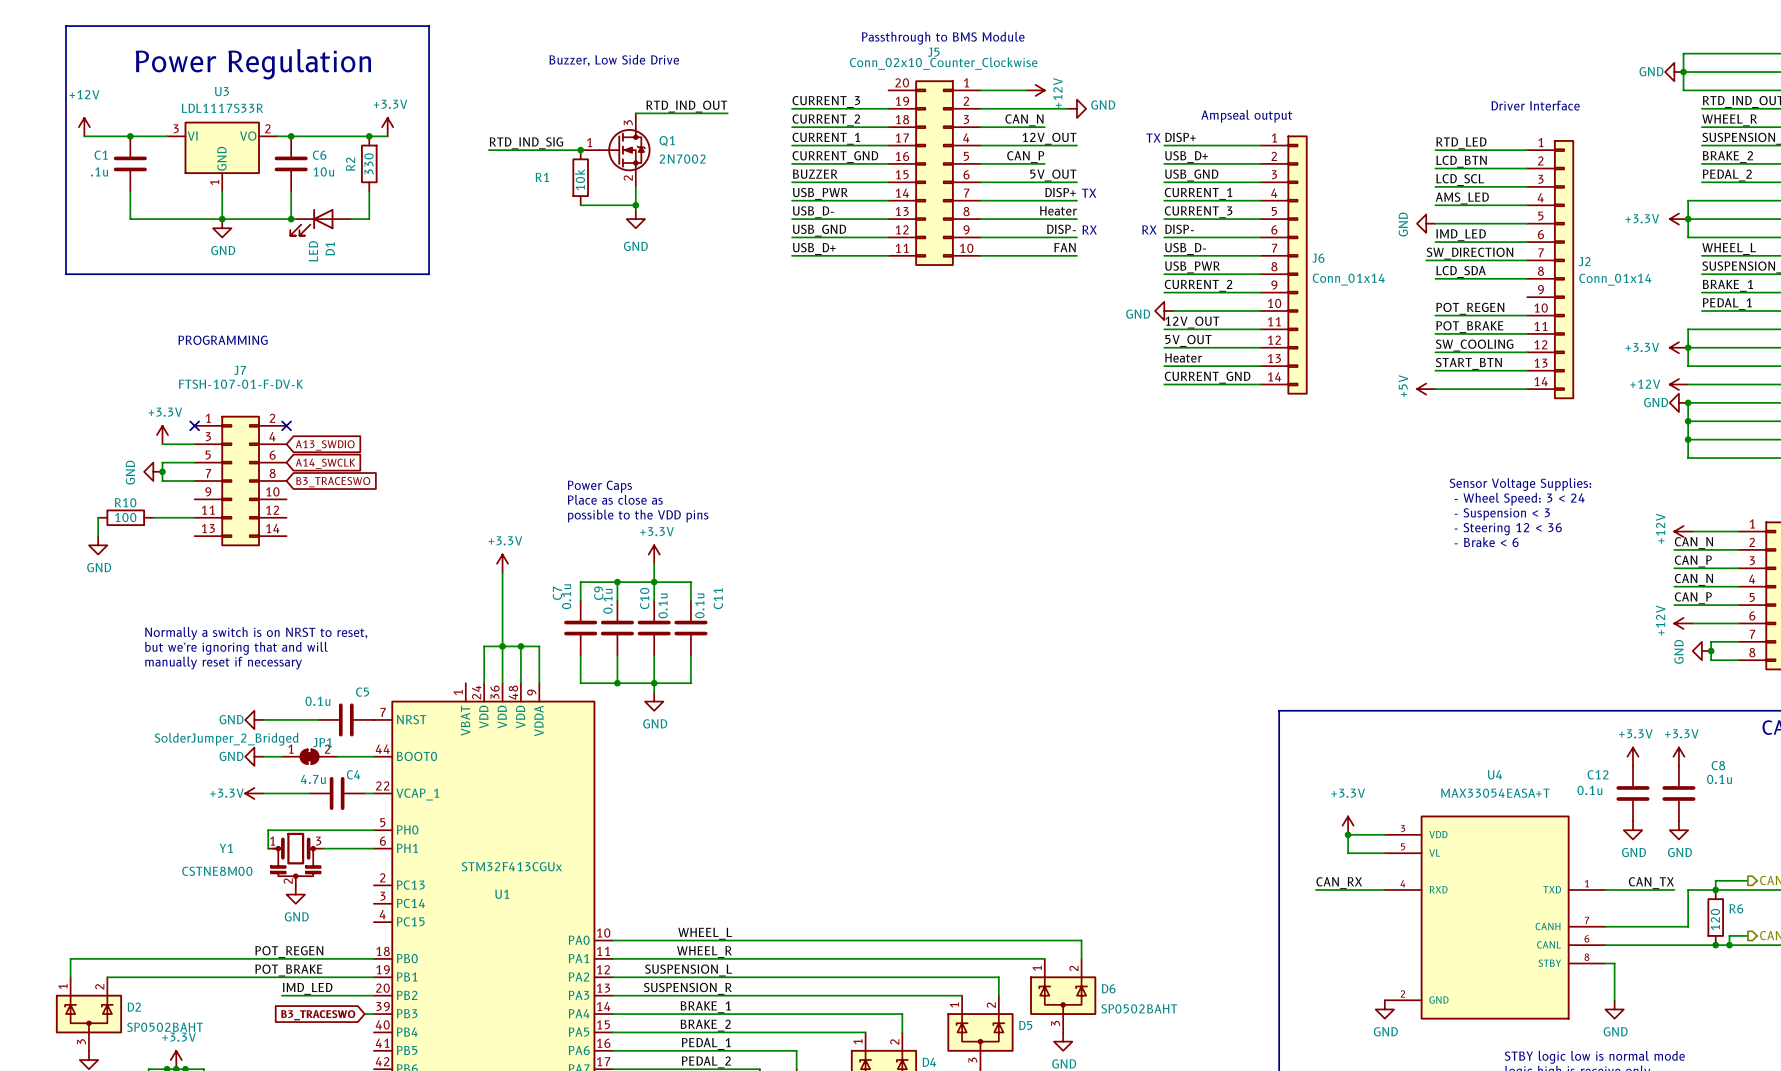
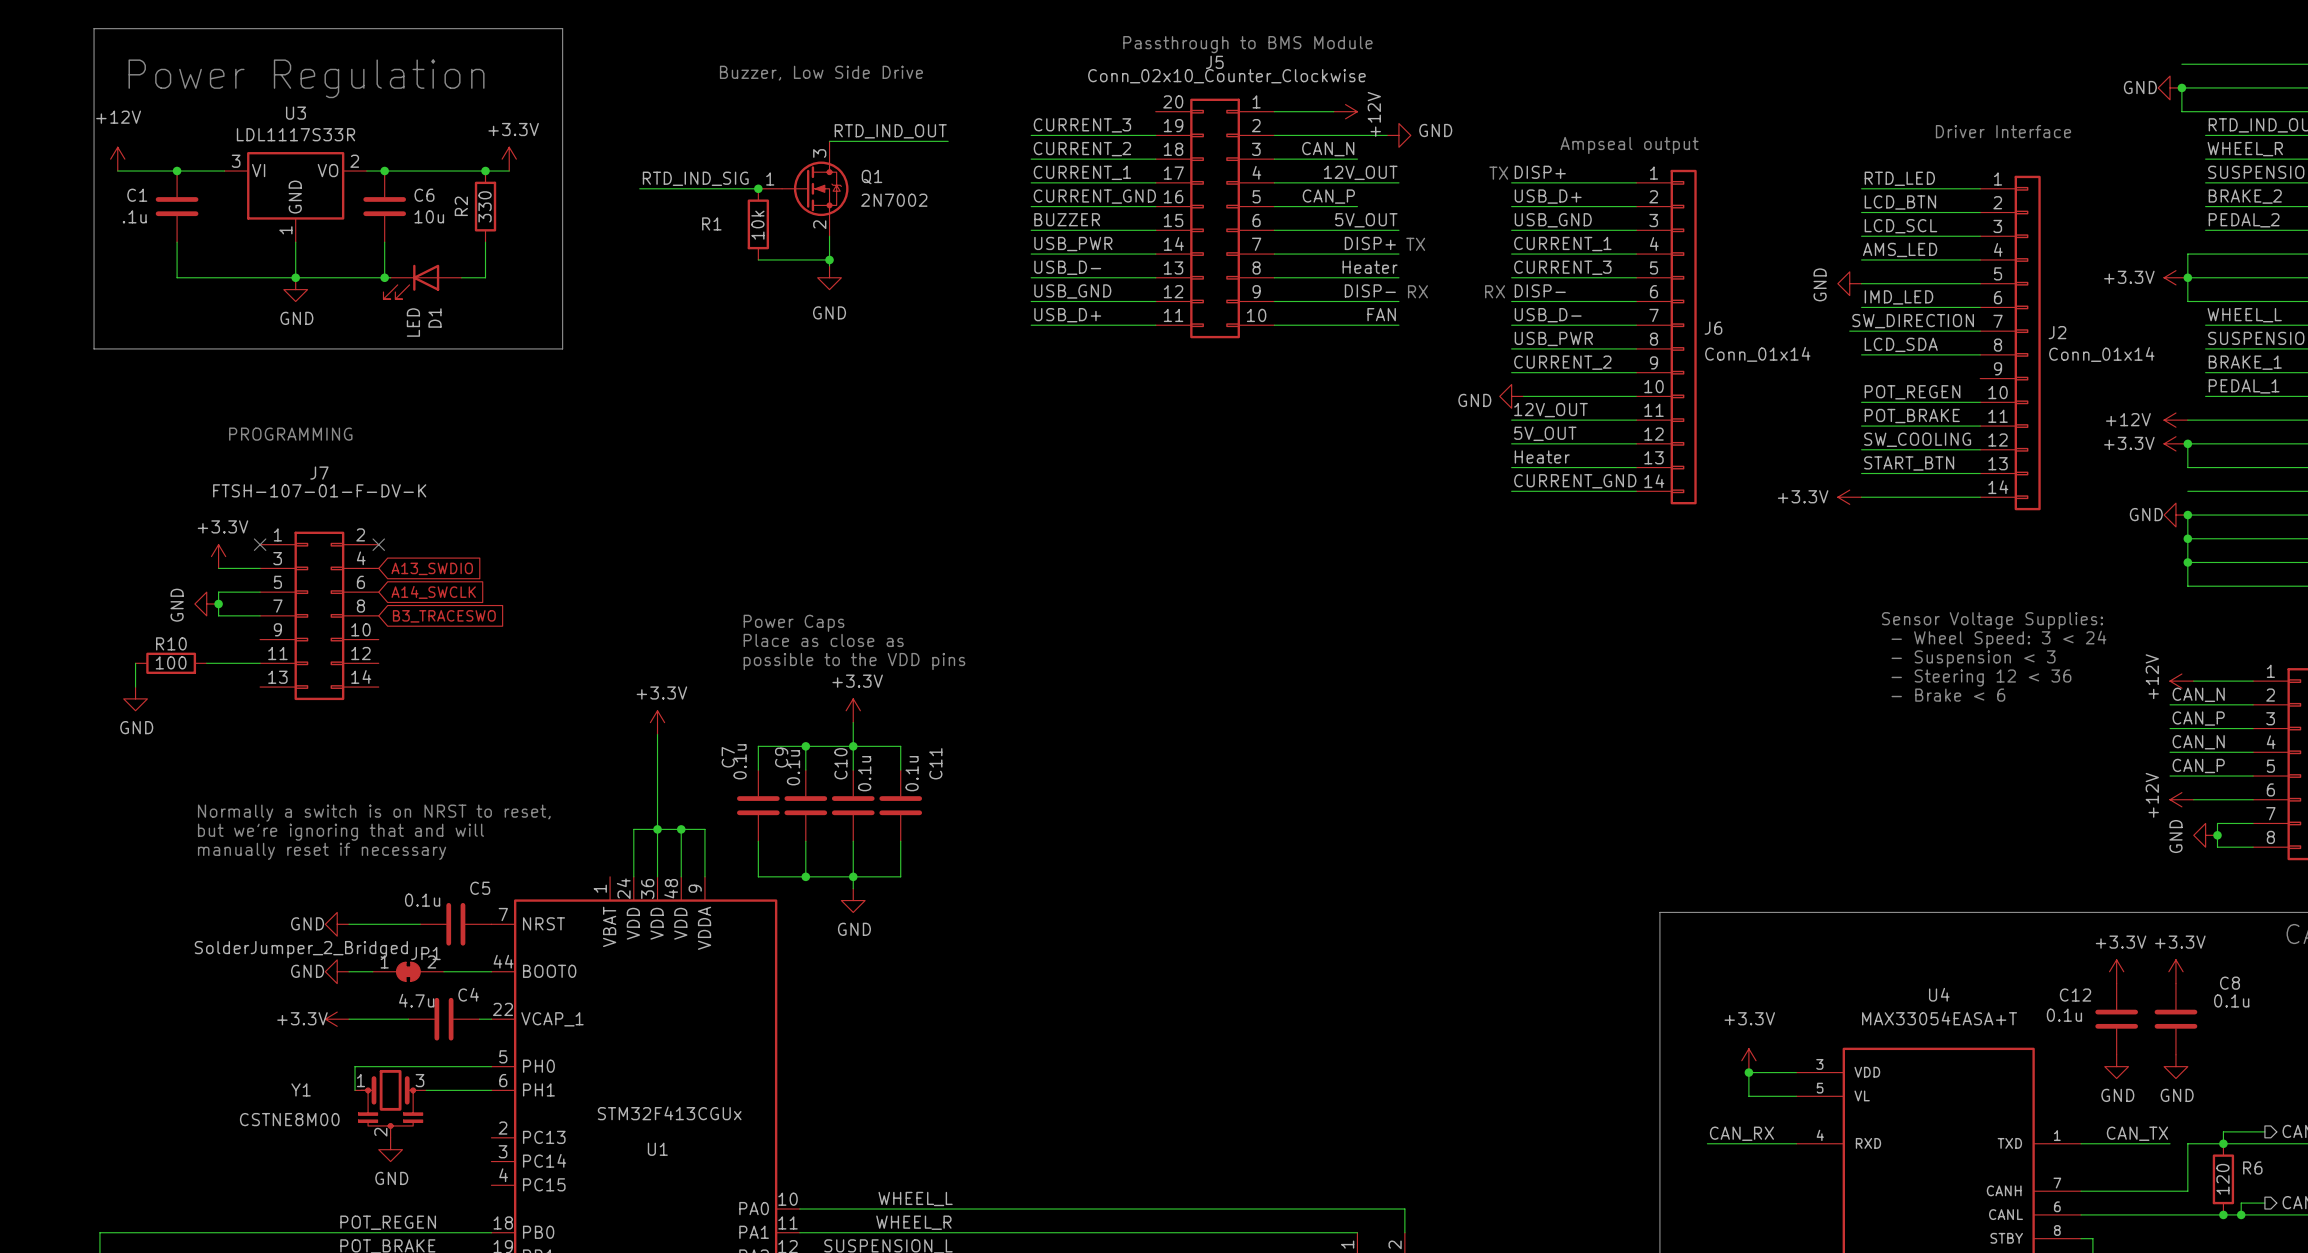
wire: (1683, 53) (1683, 72) -> none
wire: (1688, 329) (1688, 347) -> none
power symbol position: +12V (1678, 384) -> +12V (2175, 420)
power symbol: +5V (1426, 389) -> +3.3V (1849, 497)

